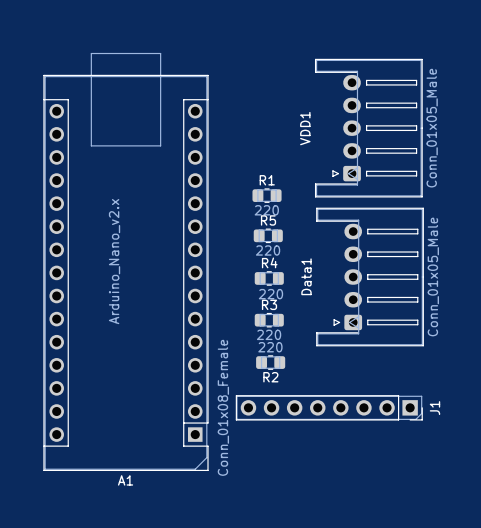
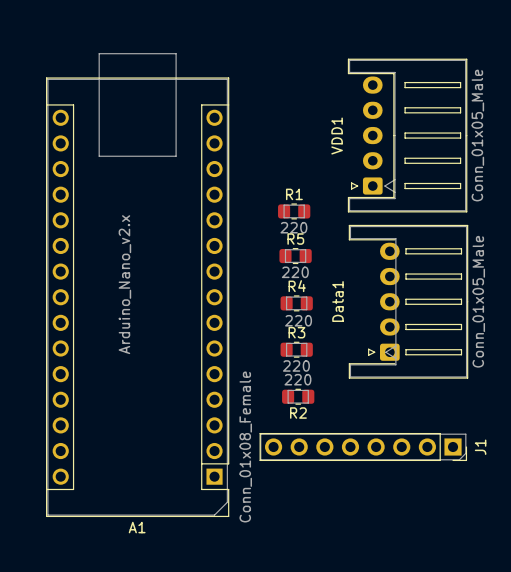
VDD1 footprint: [315, 58, 423, 198] -> [347, 58, 468, 213]

